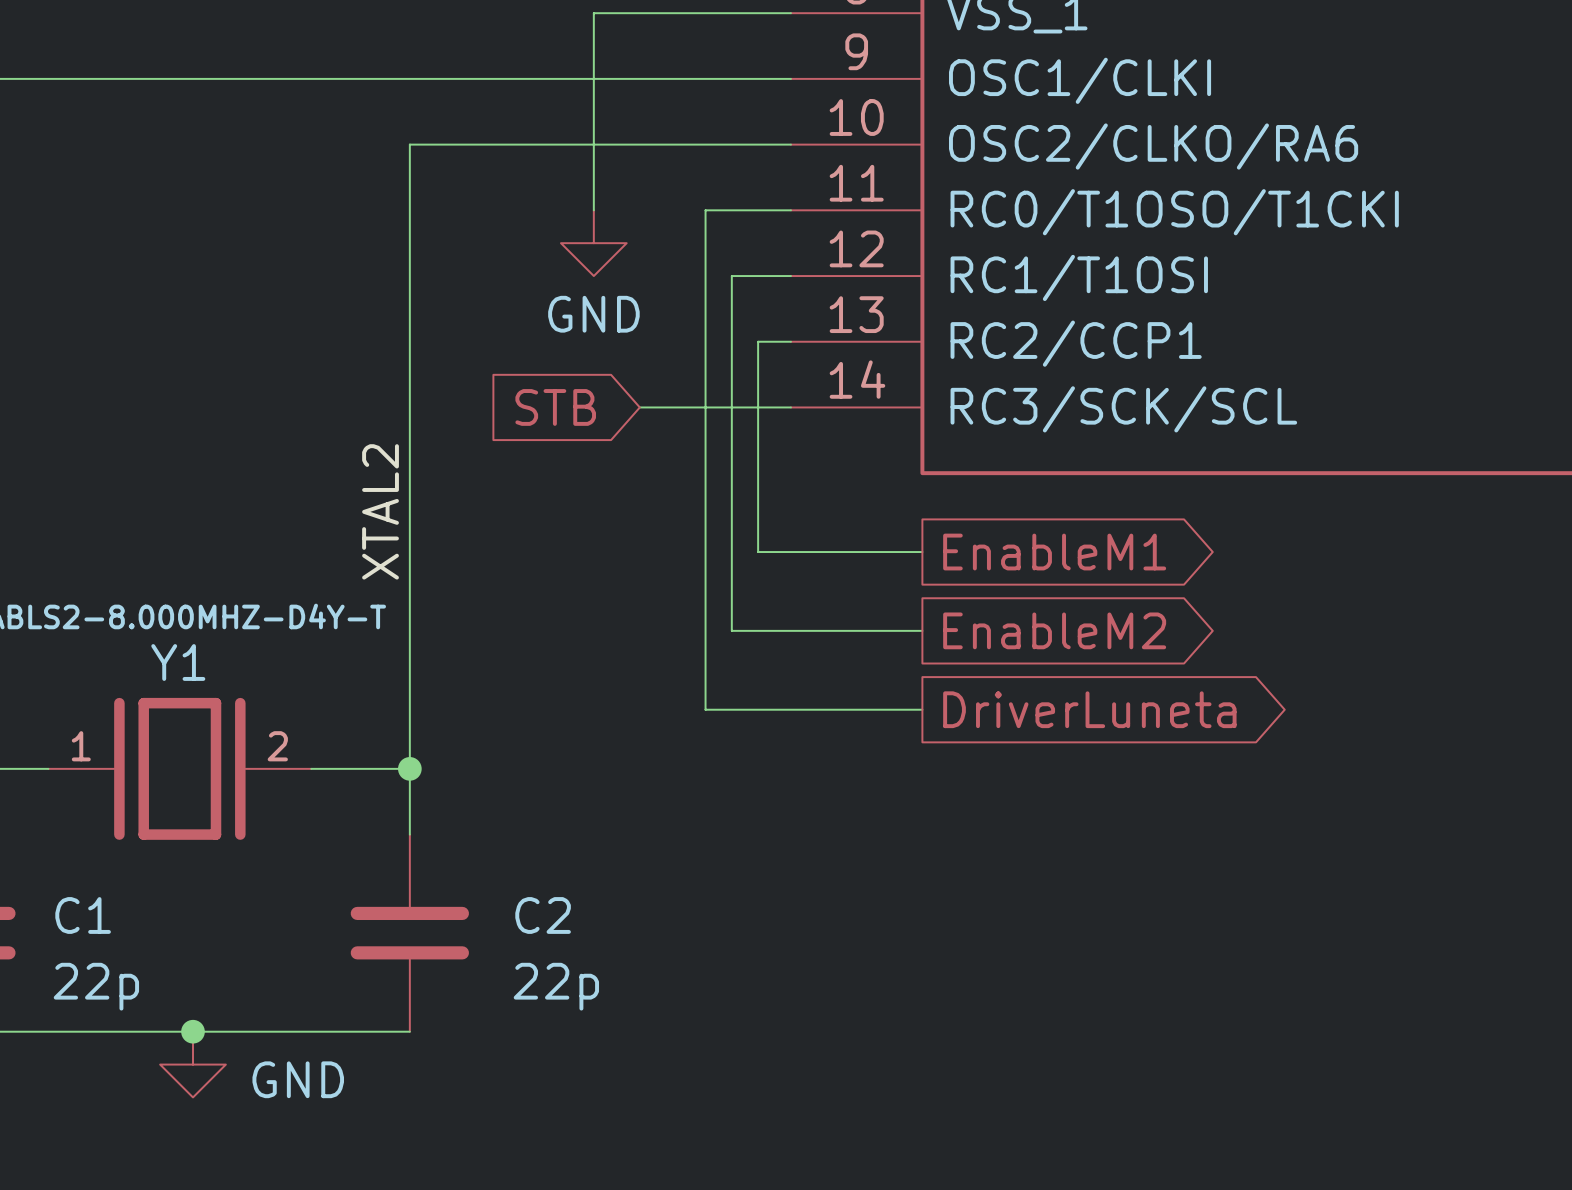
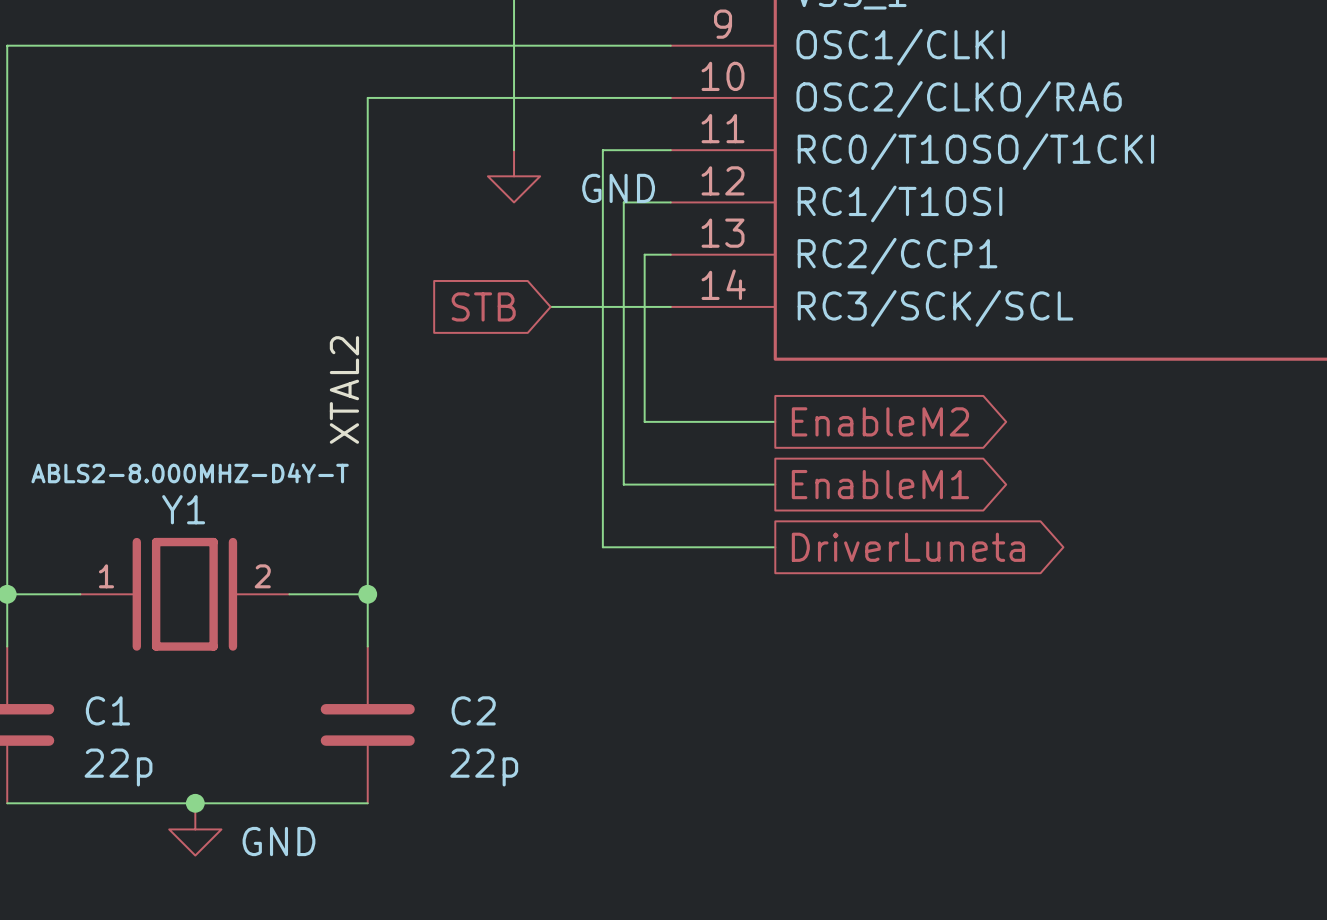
power symbol text position: GND (593, 314) -> GND (618, 188)
global label: EnableM1 (1054, 552) -> EnableM2 (880, 421)
global label: EnableM2 (1054, 630) -> EnableM1 (880, 484)

